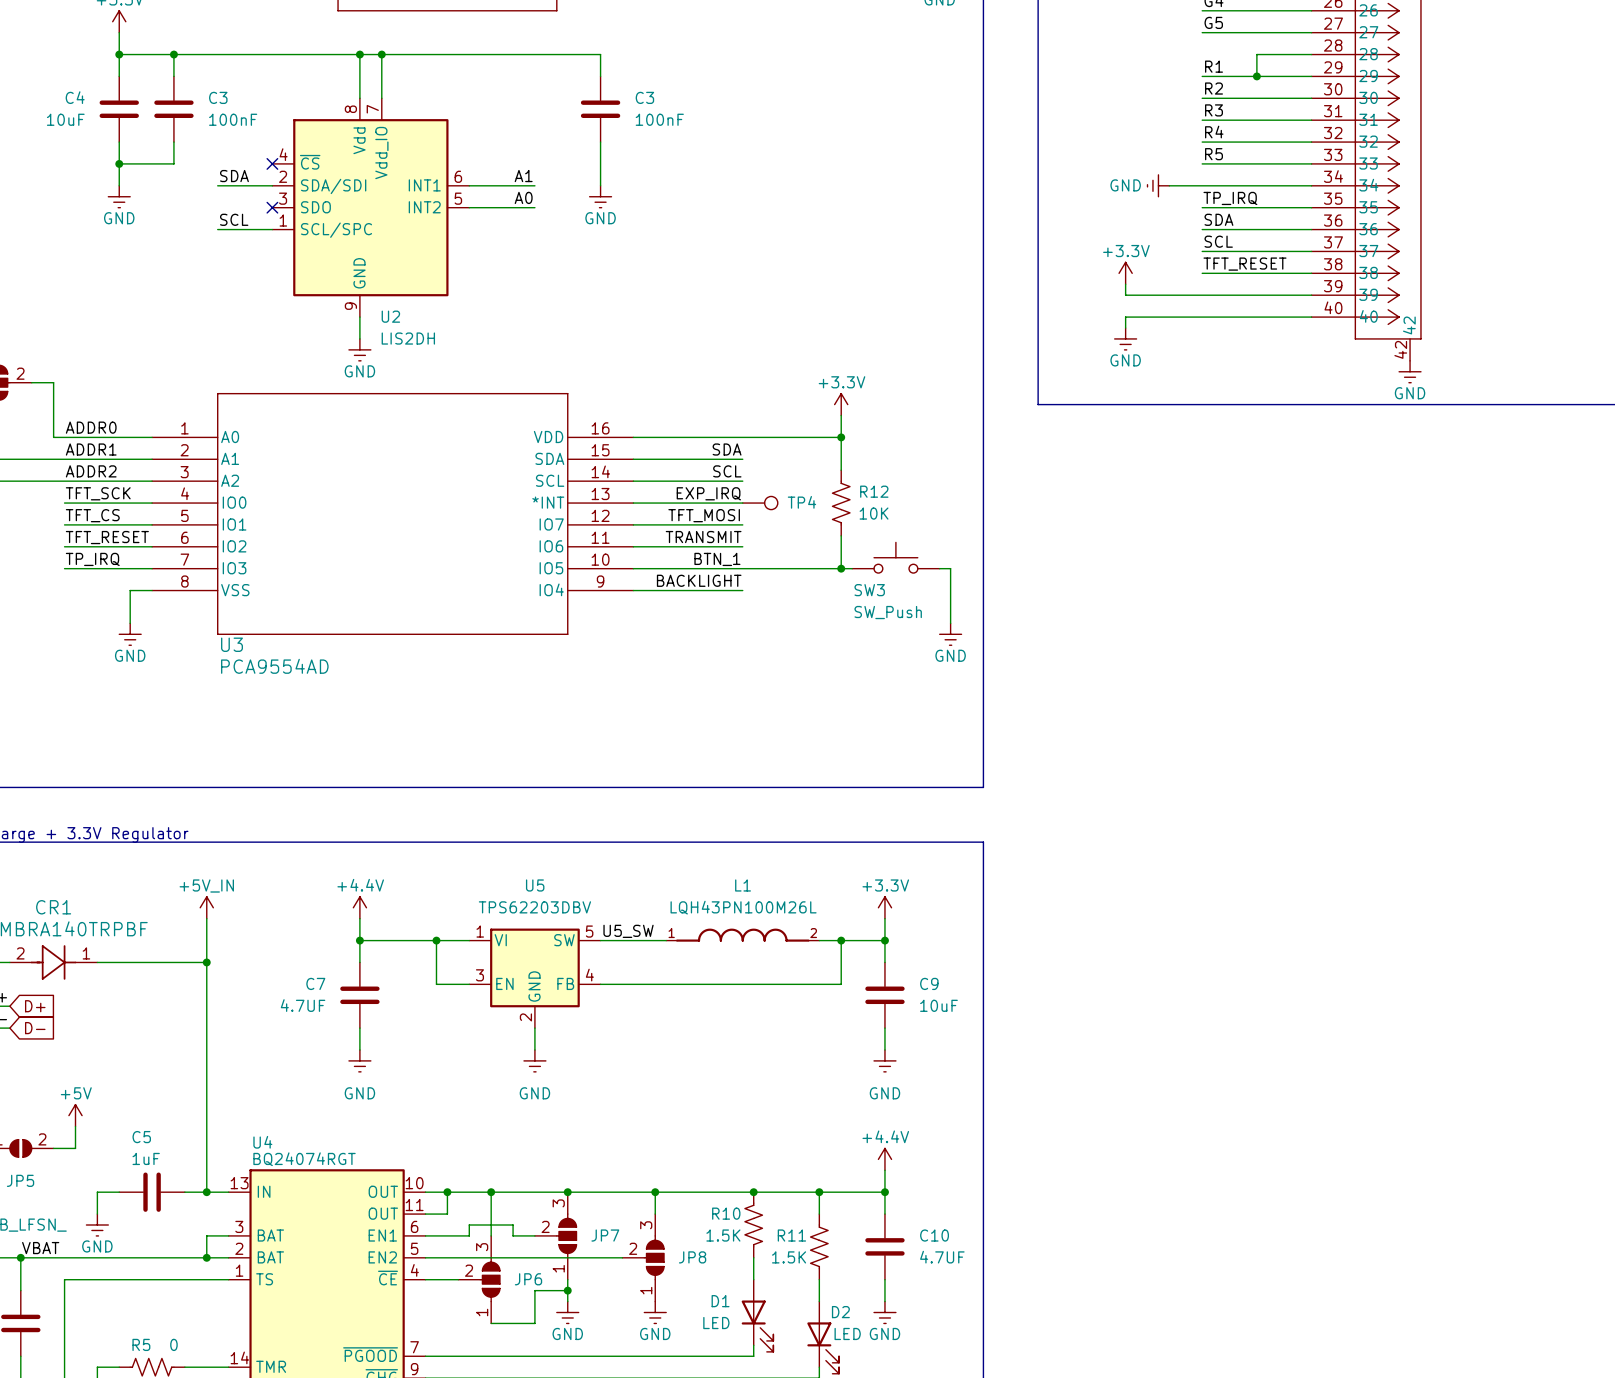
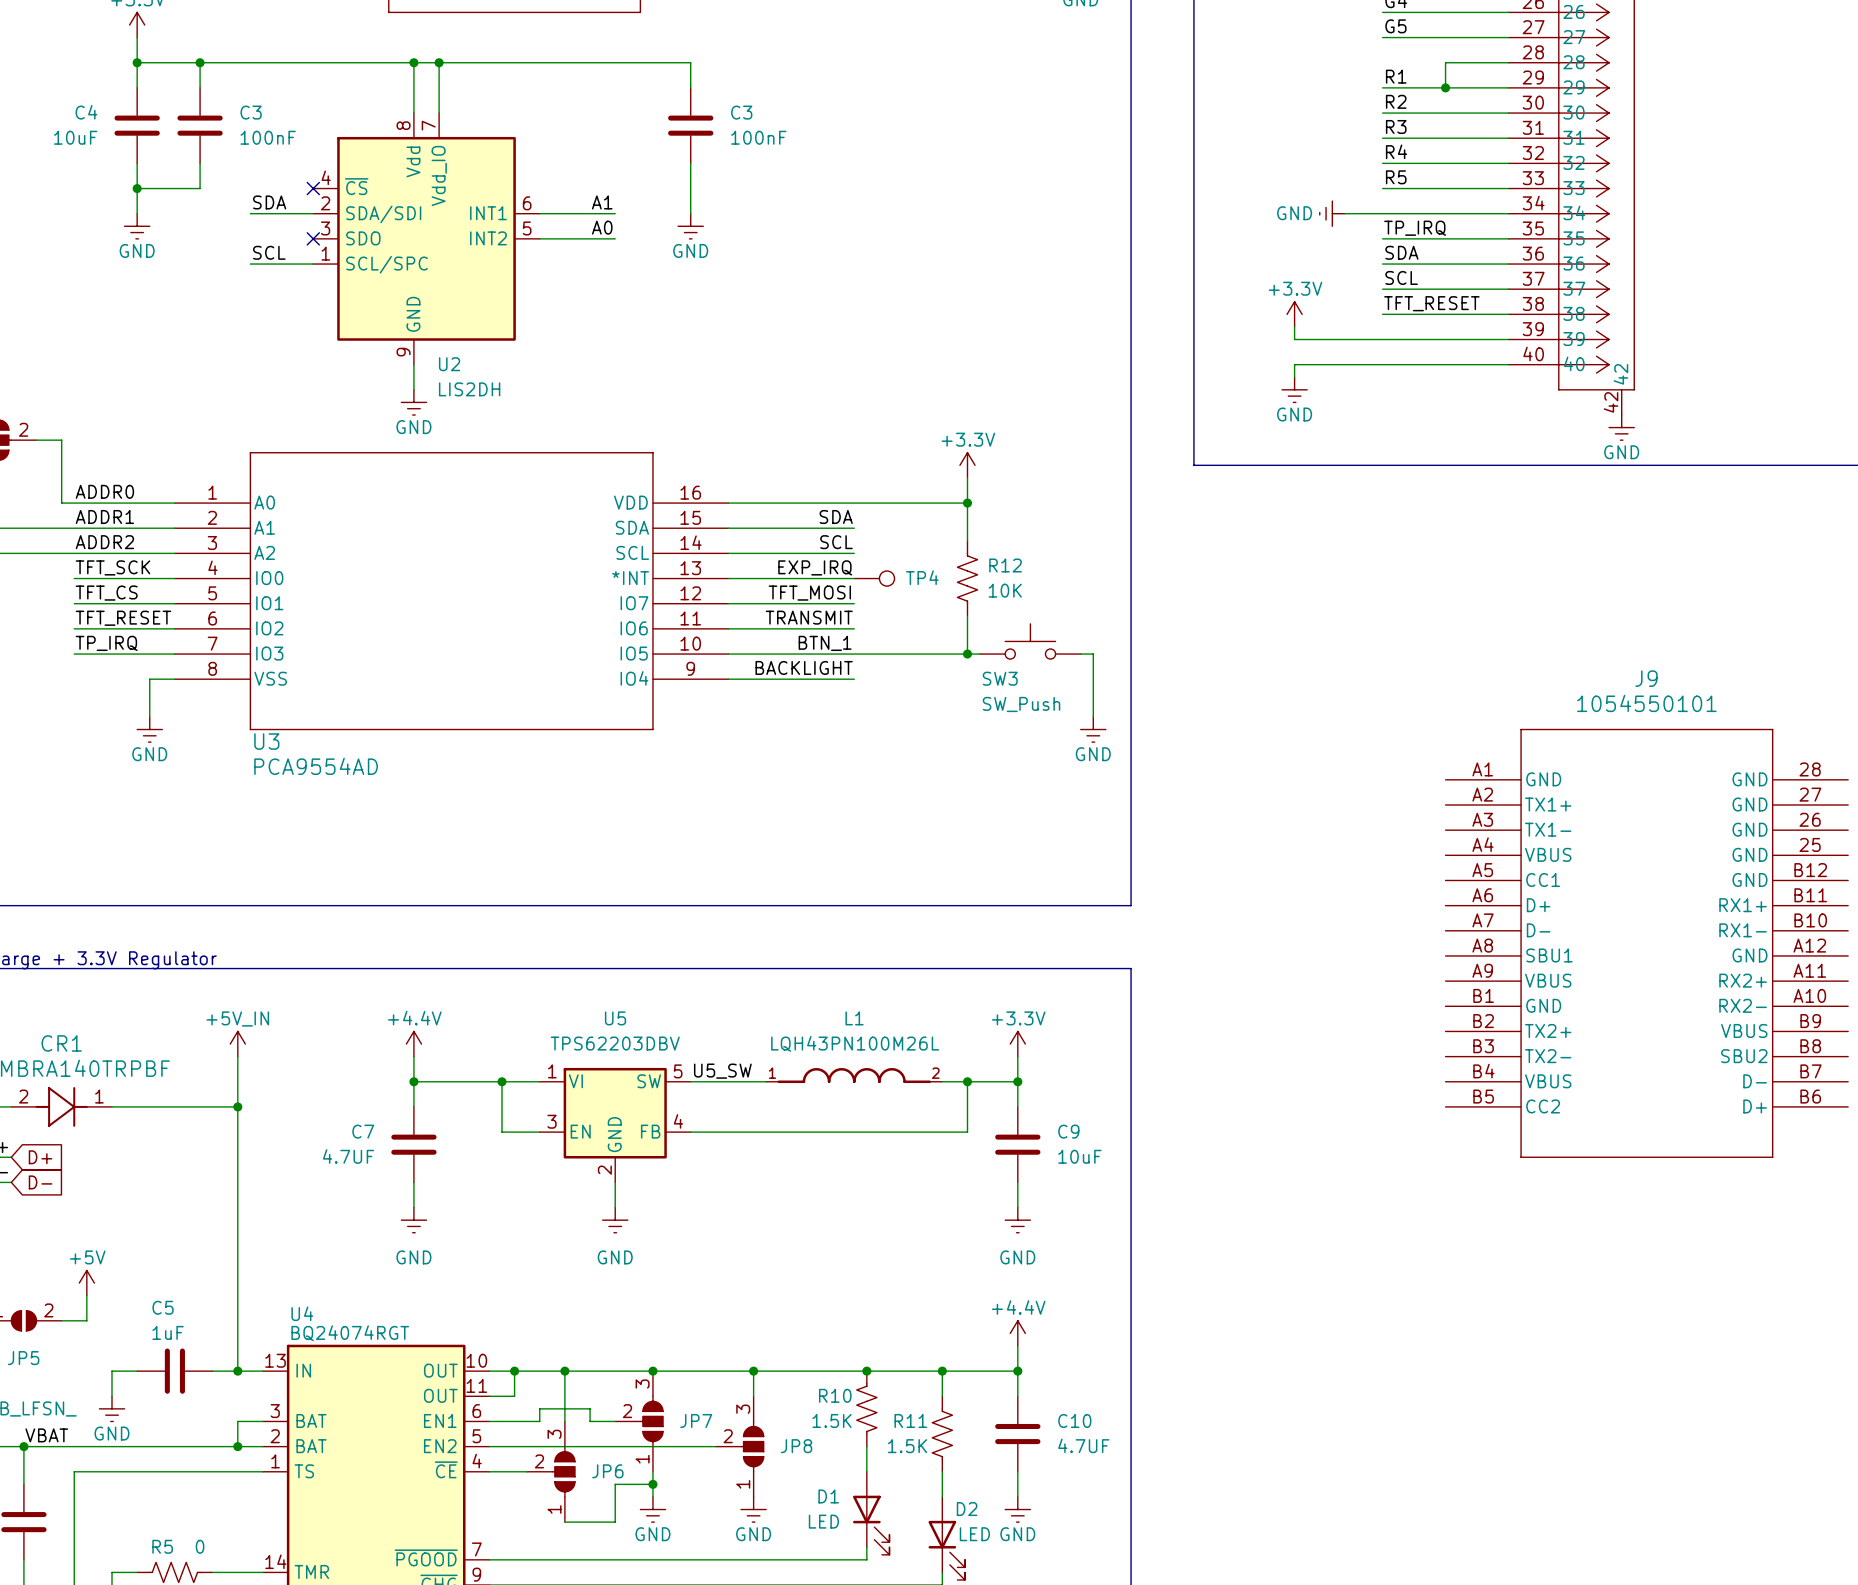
J9: none -> 1054550101 (1646, 943)

